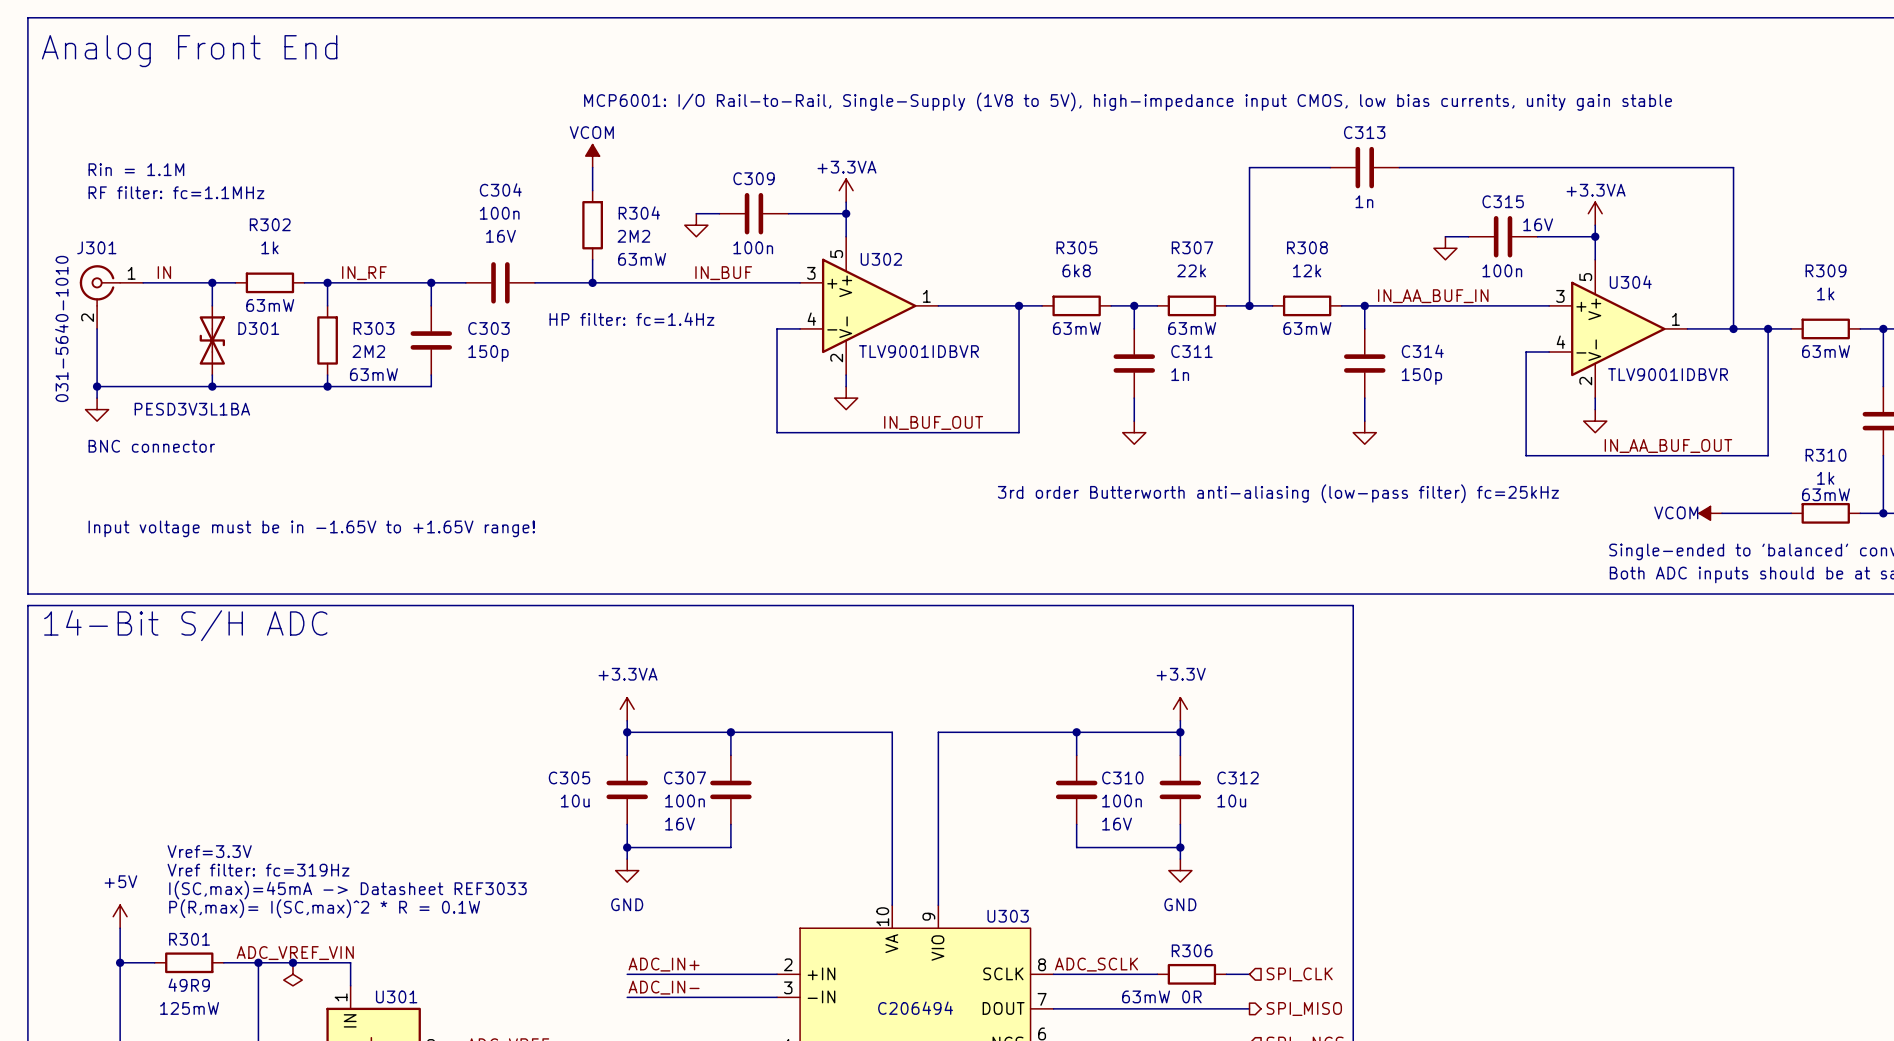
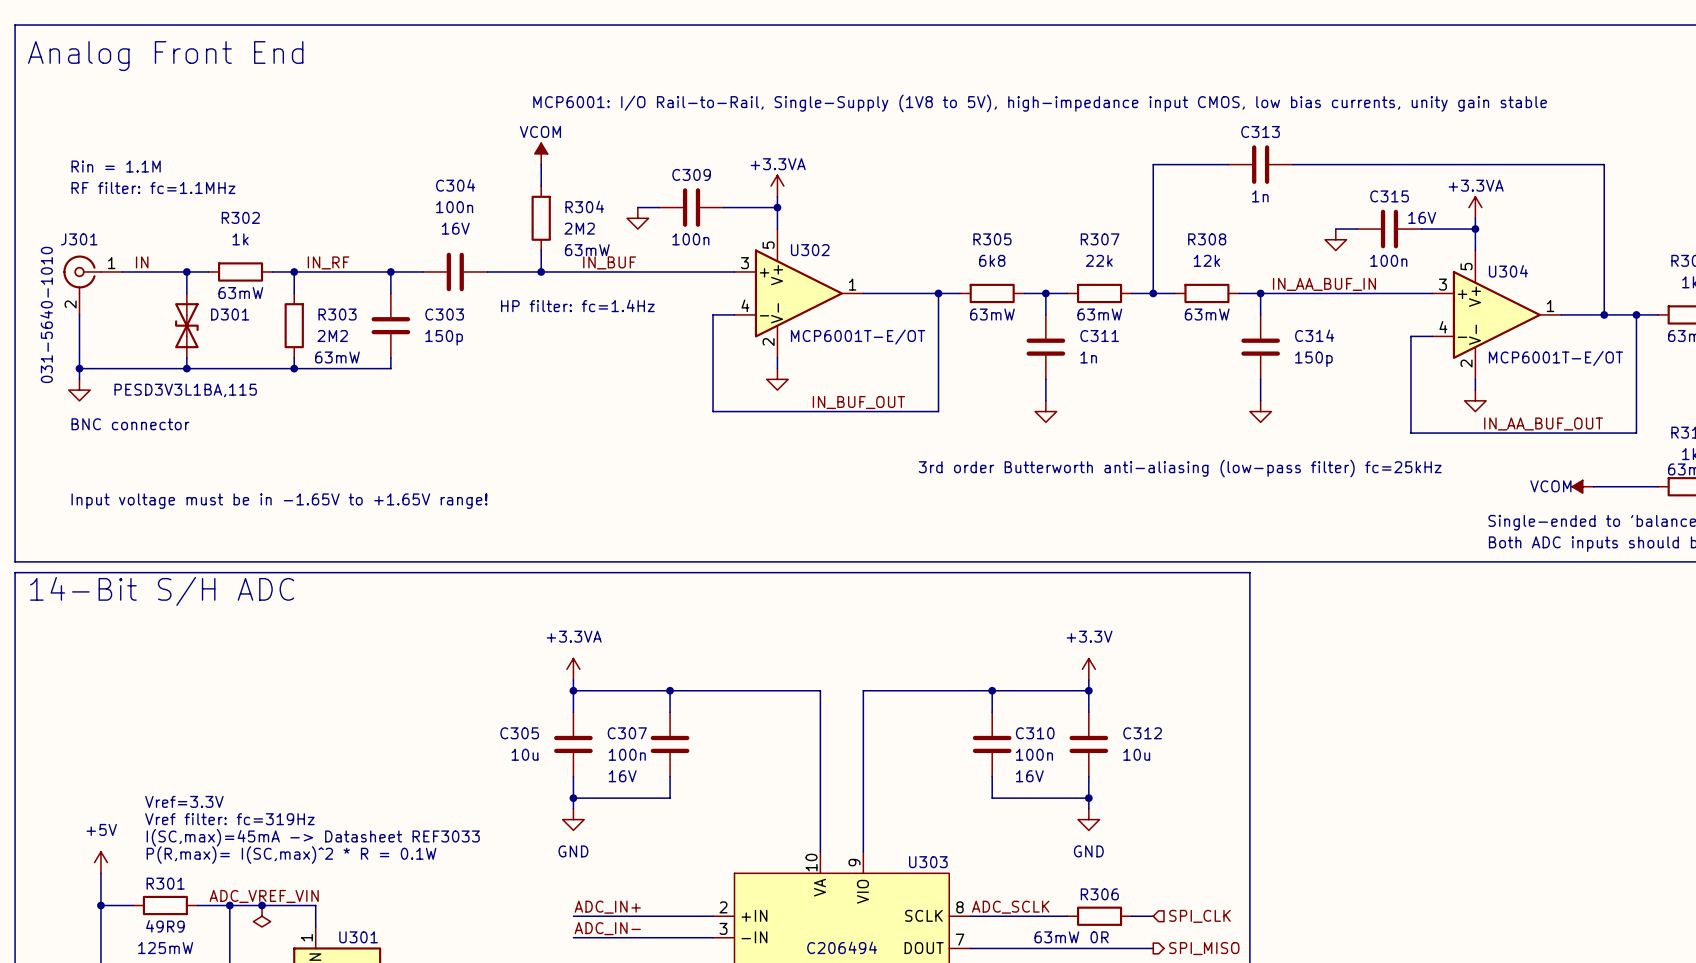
label position: IN_BUF (723, 273) -> IN_BUF (609, 262)
U302 value: TLV9001IDBVR (918, 351) -> MCP6001T-E/OT (858, 337)
U304 value: TLV9001IDBVR (1668, 374) -> MCP6001T-E/OT (1556, 358)
D301 value: PESD3V3L1BA (192, 409) -> PESD3V3L1BA,115 (185, 390)

